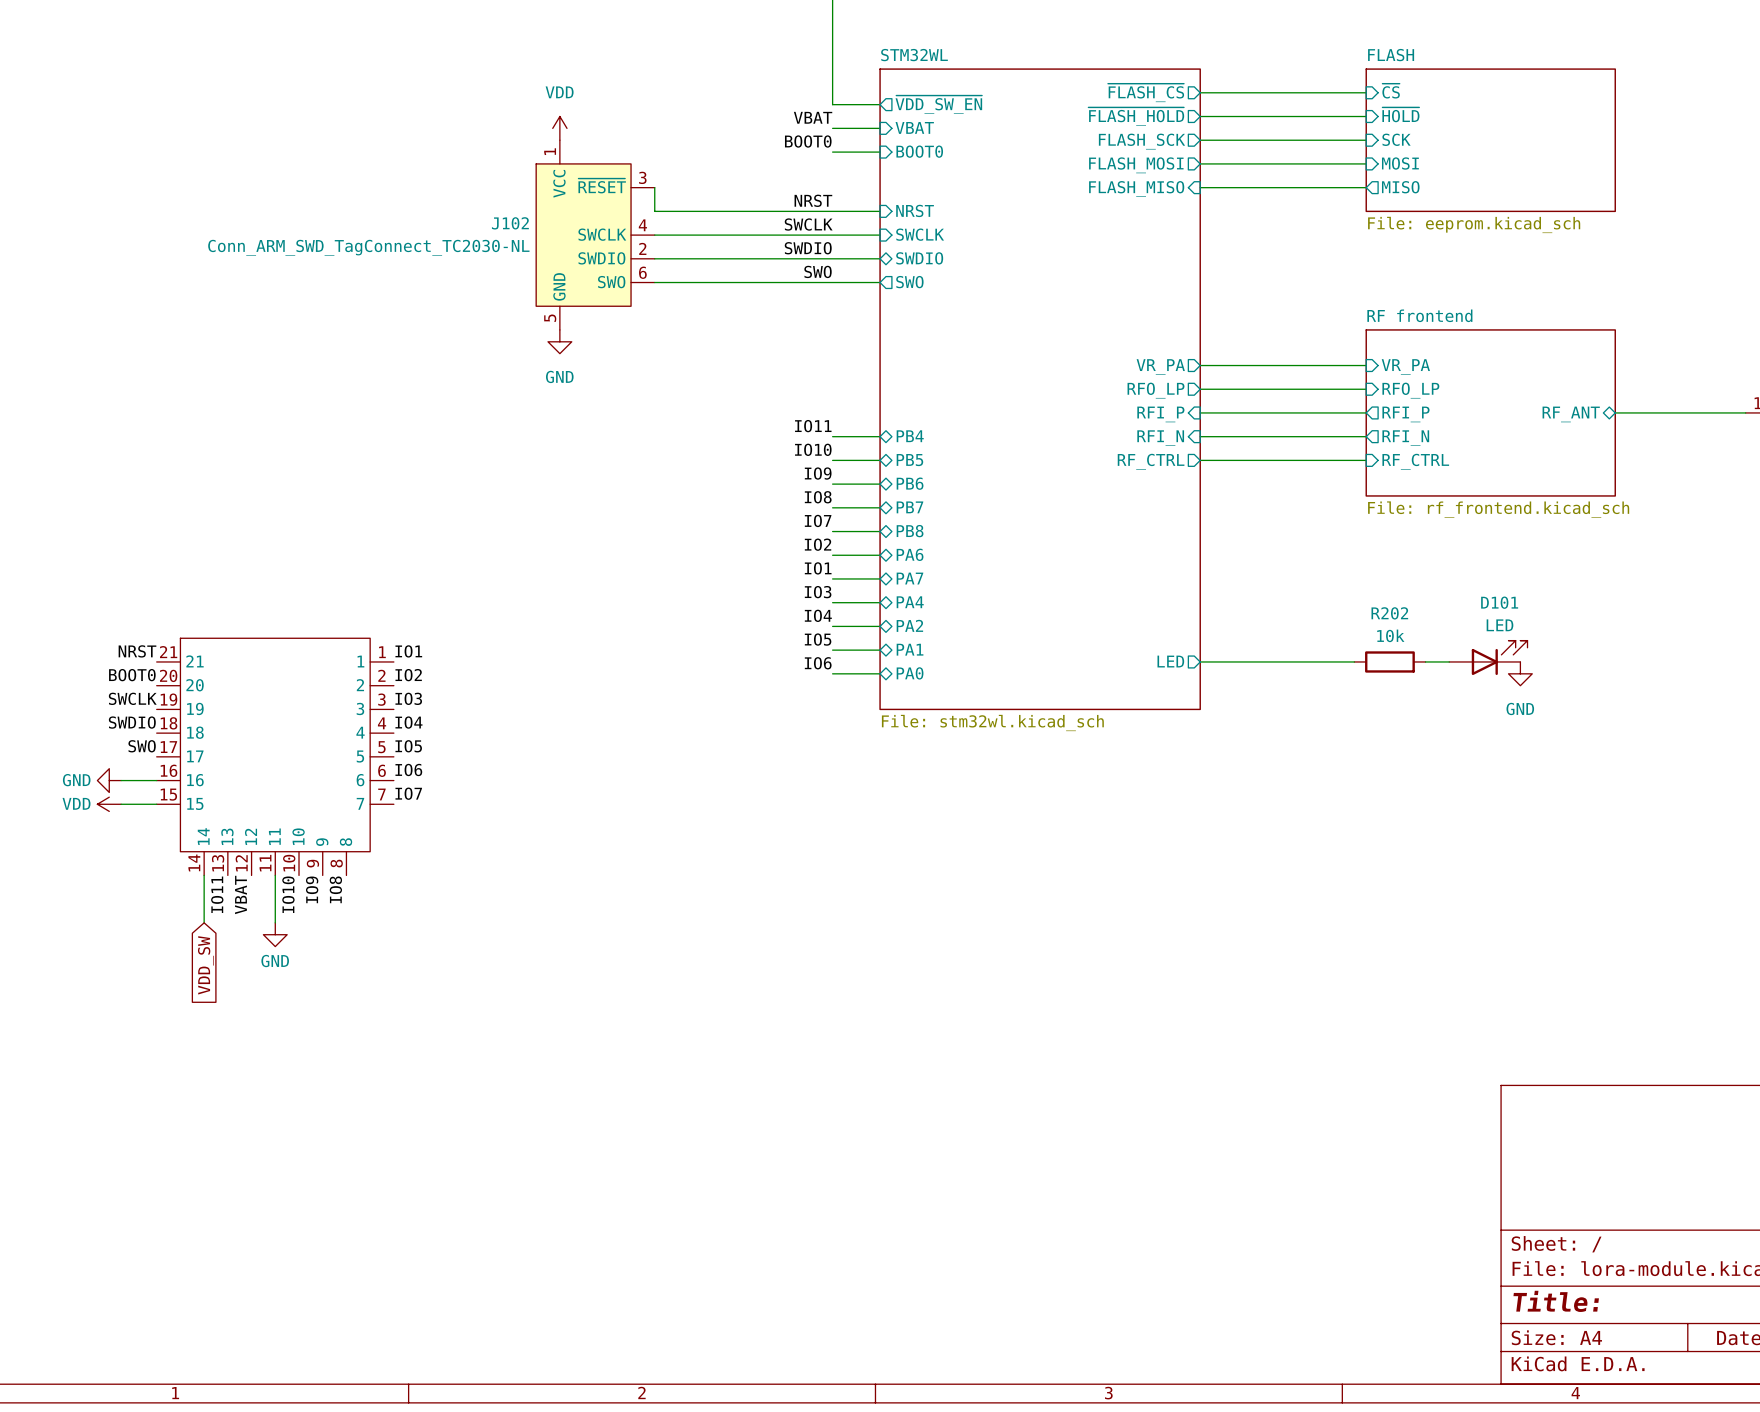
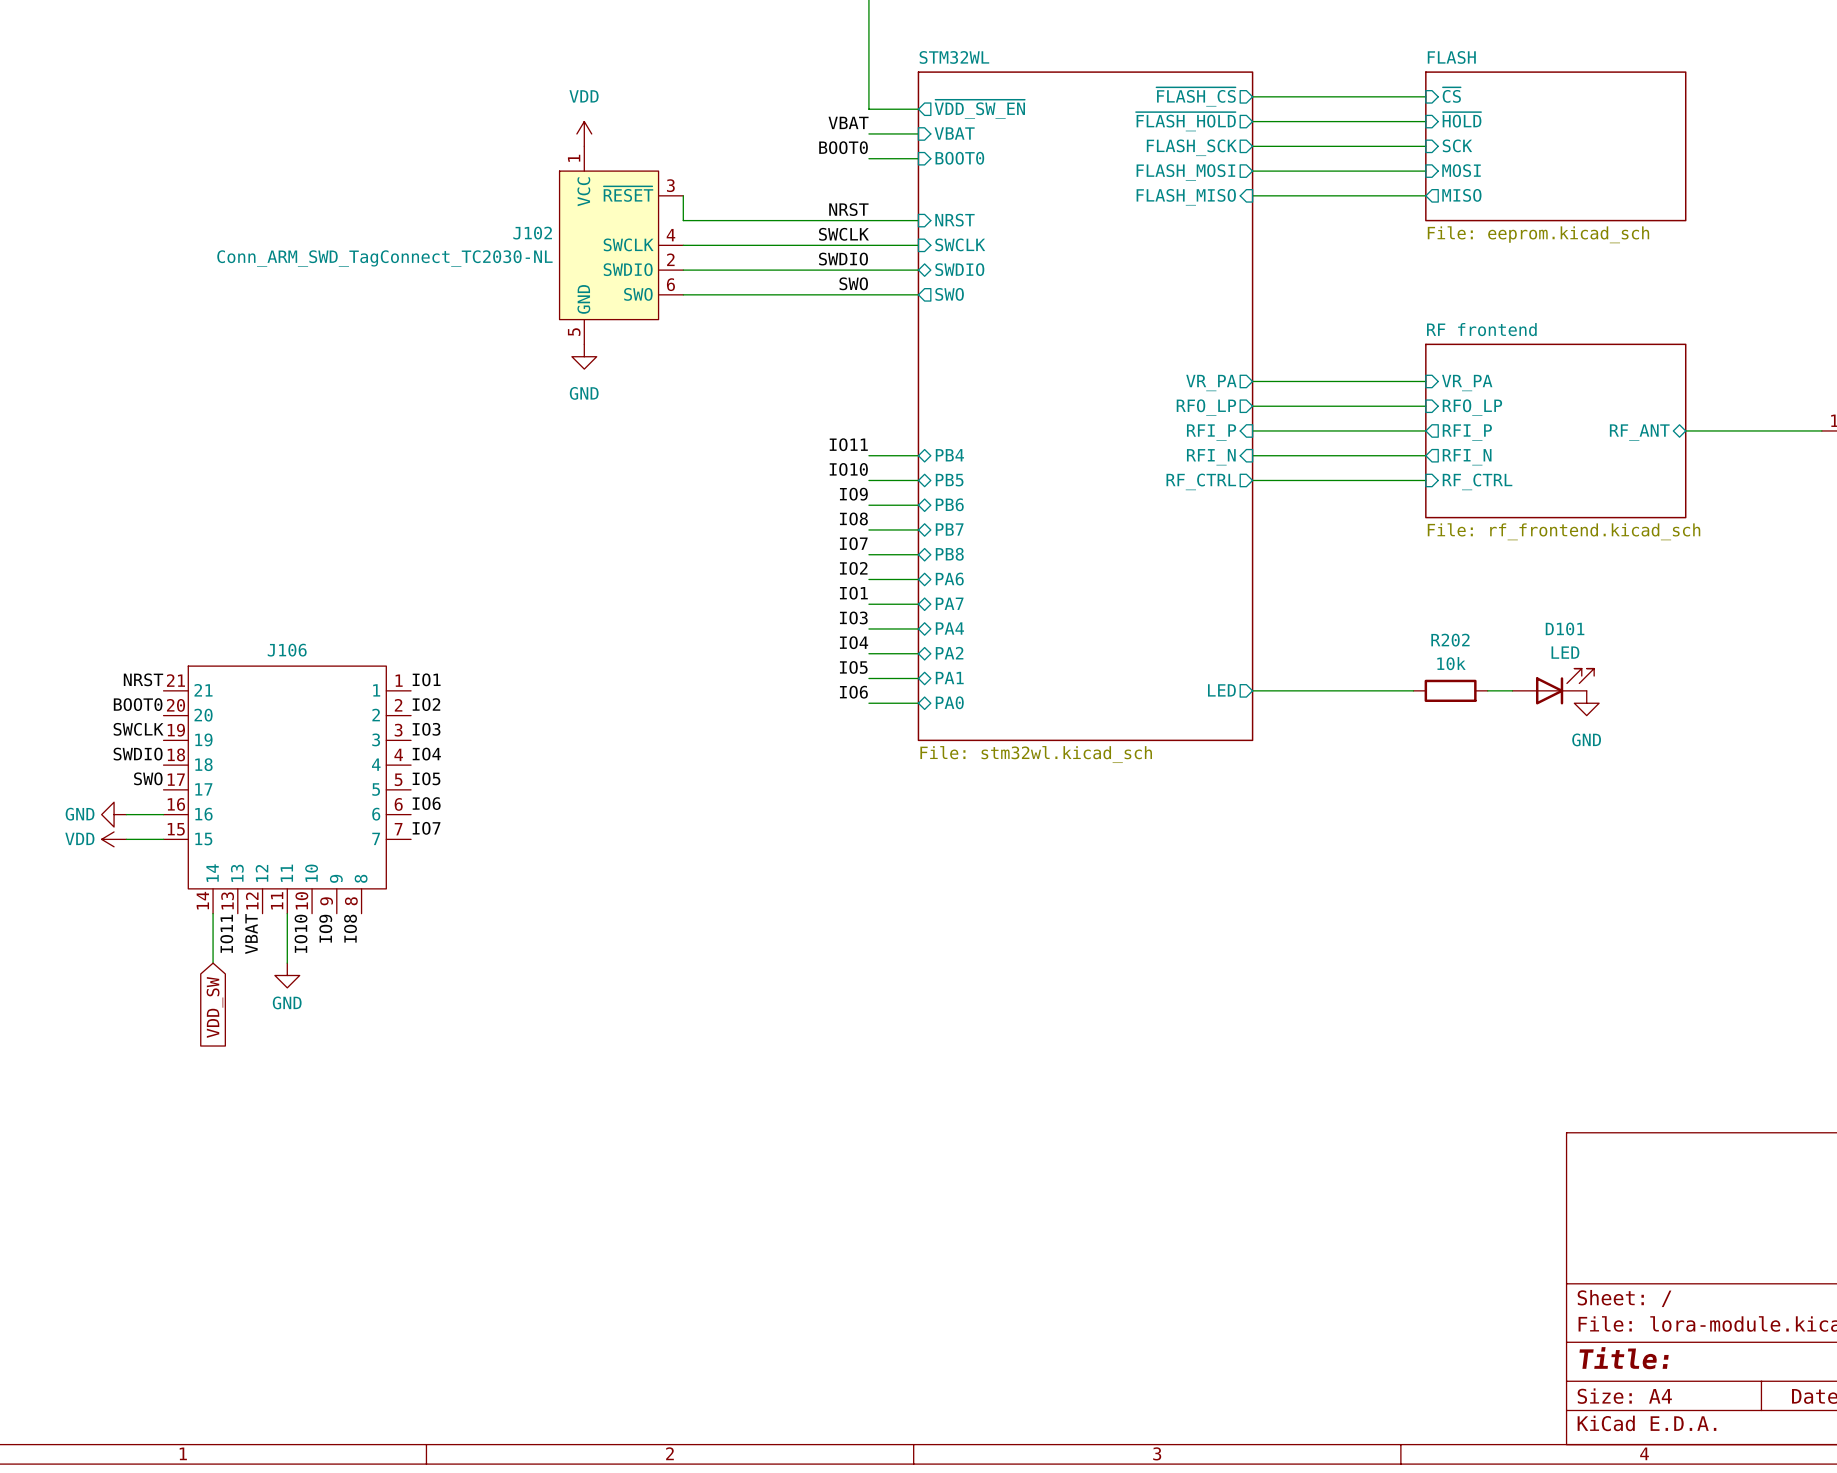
J106 name: none -> J106 (287, 650)

